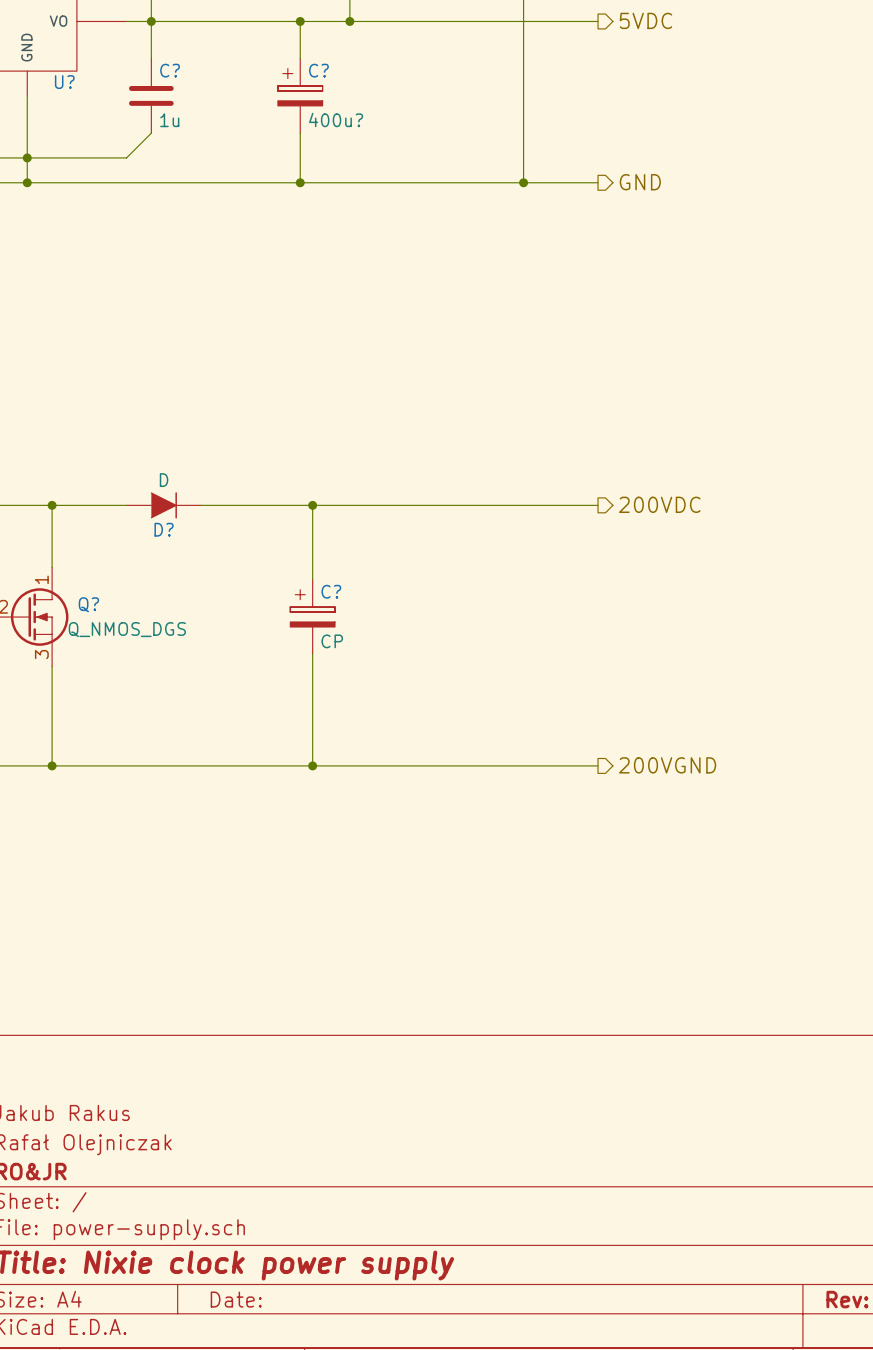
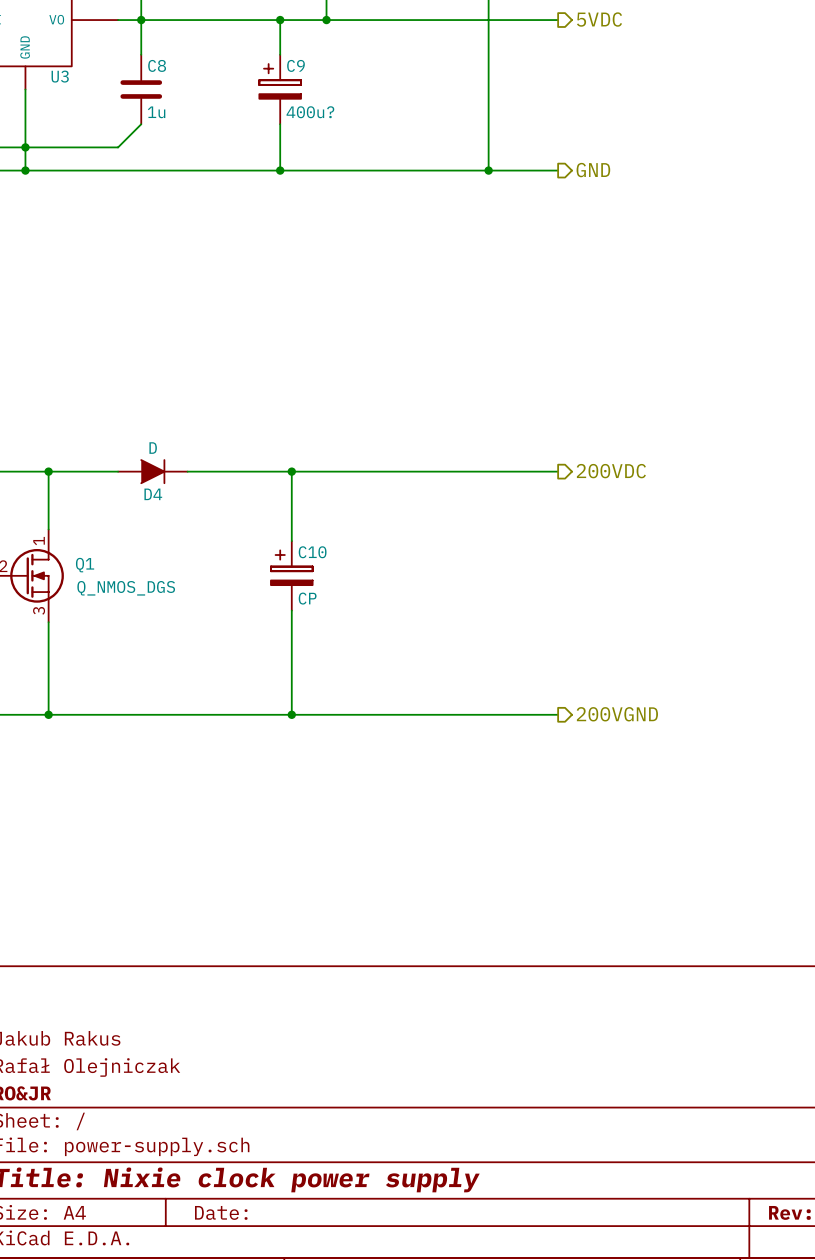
C? name: C? (170, 70) -> C8 (157, 65)
C? name: C? (318, 70) -> C9 (295, 65)
U? name: U? (64, 82) -> U3 (60, 76)
D? name: D? (164, 529) -> D4 (153, 494)
C? name: C? (331, 591) -> C10 (312, 552)
Q? name: Q? (88, 604) -> Q1 (85, 565)

